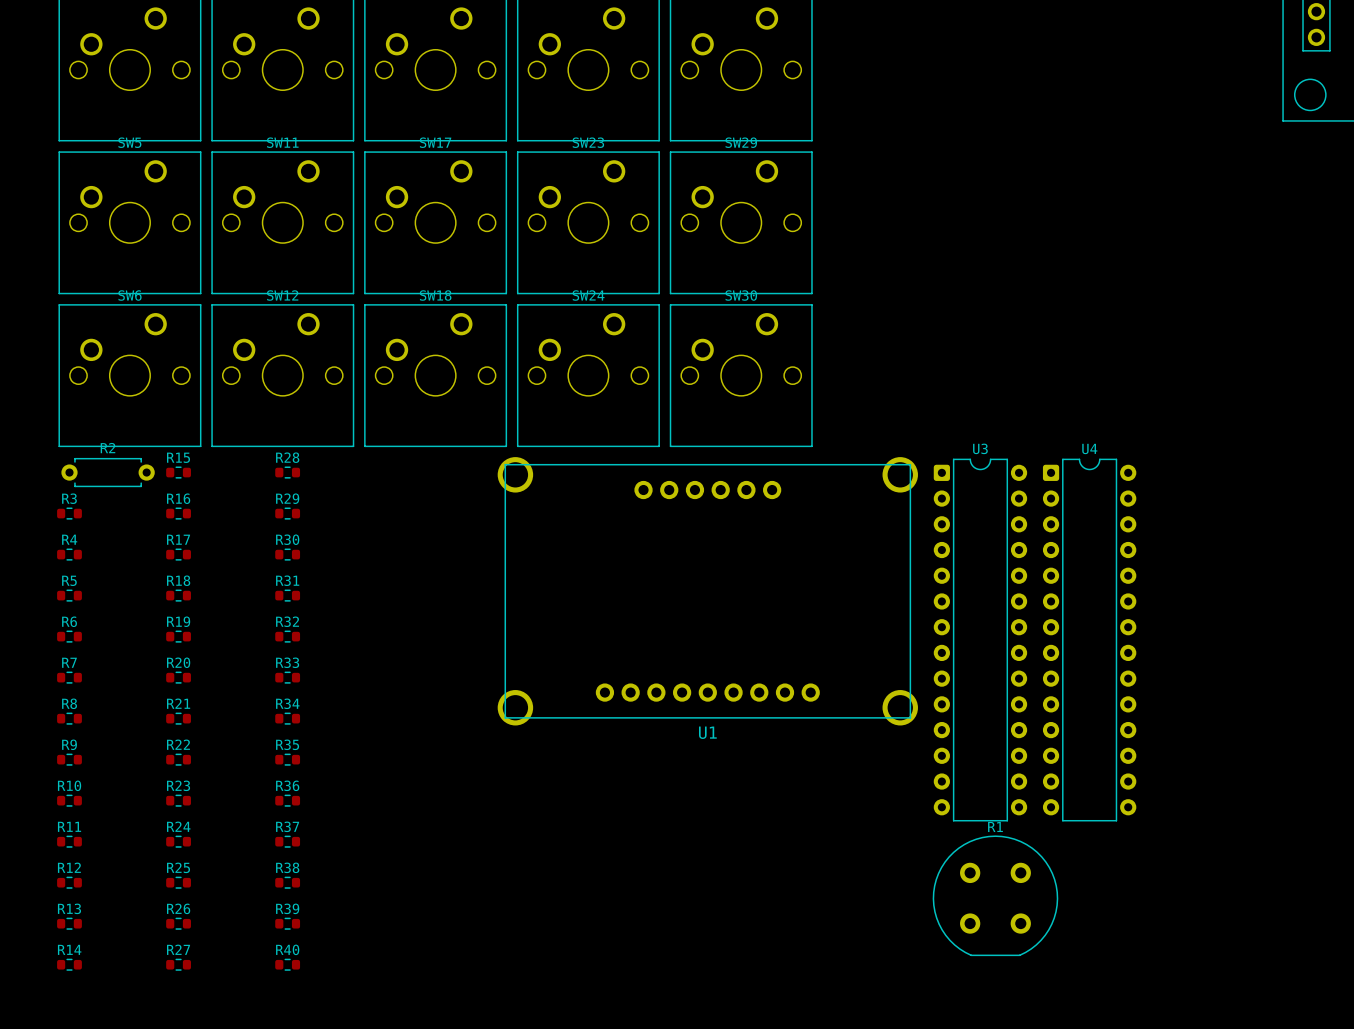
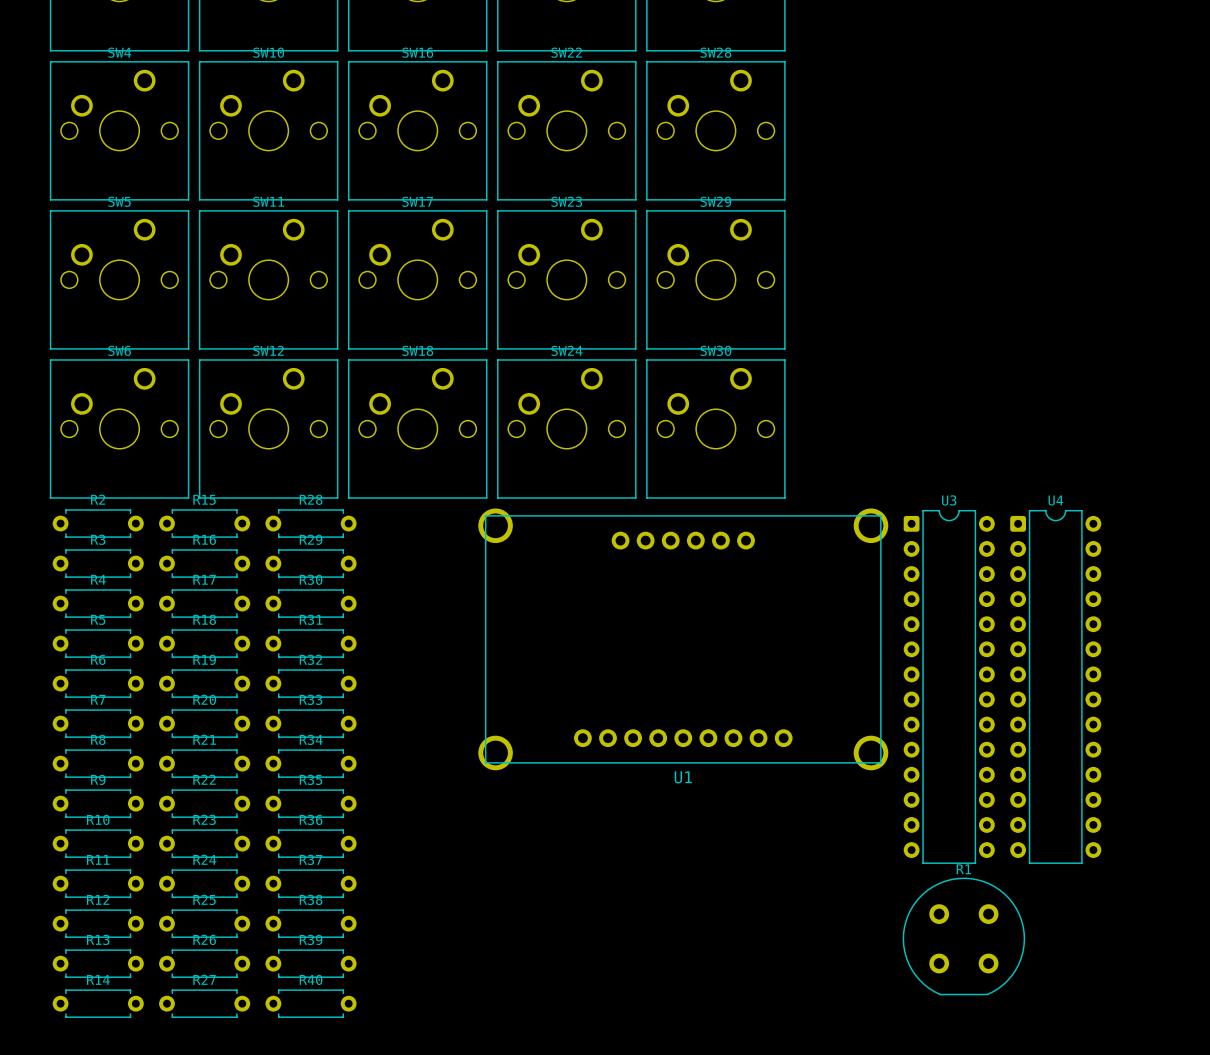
R15 footprint: [166, 466, 191, 479] -> [159, 509, 251, 538]
R28 footprint: [275, 466, 301, 479] -> [265, 509, 357, 538]
R3 footprint: [57, 507, 82, 520] -> [52, 549, 144, 578]
R16 footprint: [166, 507, 191, 520] -> [159, 549, 251, 578]
R29 footprint: [275, 507, 301, 520] -> [265, 549, 357, 578]
R4 footprint: [57, 548, 82, 561] -> [52, 589, 144, 618]
R17 footprint: [166, 548, 191, 561] -> [159, 589, 251, 618]
R30 footprint: [275, 548, 301, 561] -> [265, 589, 357, 618]
R5 footprint: [57, 589, 82, 602] -> [52, 629, 144, 658]
R18 footprint: [166, 589, 191, 602] -> [159, 629, 251, 658]
R31 footprint: [275, 589, 301, 602] -> [265, 629, 357, 658]
R6 footprint: [57, 630, 82, 643] -> [52, 669, 144, 698]
R19 footprint: [166, 630, 191, 643] -> [159, 669, 251, 698]
R32 footprint: [275, 630, 301, 643] -> [265, 669, 357, 698]
R7 footprint: [57, 671, 82, 684] -> [52, 709, 144, 738]
R20 footprint: [166, 671, 191, 684] -> [159, 709, 251, 738]
R33 footprint: [275, 671, 301, 684] -> [265, 709, 357, 738]
R8 footprint: [57, 712, 82, 725] -> [52, 749, 144, 778]
R21 footprint: [166, 712, 191, 725] -> [159, 749, 251, 778]
R34 footprint: [275, 712, 301, 725] -> [265, 749, 357, 778]
R9 footprint: [57, 753, 82, 766] -> [52, 789, 144, 818]
R22 footprint: [166, 753, 191, 766] -> [159, 789, 251, 818]
R35 footprint: [275, 753, 301, 766] -> [265, 789, 357, 818]
R10 footprint: [57, 794, 82, 807] -> [52, 829, 144, 858]
R23 footprint: [166, 794, 191, 807] -> [159, 829, 251, 858]
R36 footprint: [275, 794, 301, 807] -> [265, 829, 357, 858]
R11 footprint: [57, 835, 82, 848] -> [52, 869, 144, 898]
R24 footprint: [166, 835, 191, 848] -> [159, 869, 251, 898]
R37 footprint: [275, 835, 301, 848] -> [265, 869, 357, 898]
R12 footprint: [57, 876, 82, 889] -> [52, 909, 144, 938]
R25 footprint: [166, 876, 191, 889] -> [159, 909, 251, 938]
R38 footprint: [275, 876, 301, 889] -> [265, 909, 357, 938]
R13 footprint: [57, 917, 82, 930] -> [52, 949, 144, 978]
R26 footprint: [166, 917, 191, 930] -> [159, 949, 251, 978]
R39 footprint: [275, 917, 301, 930] -> [265, 949, 357, 978]
R14 footprint: [57, 958, 82, 971] -> [52, 989, 144, 1018]
R27 footprint: [166, 958, 191, 971] -> [159, 989, 251, 1018]
R40 footprint: [275, 958, 301, 971] -> [265, 989, 357, 1018]

